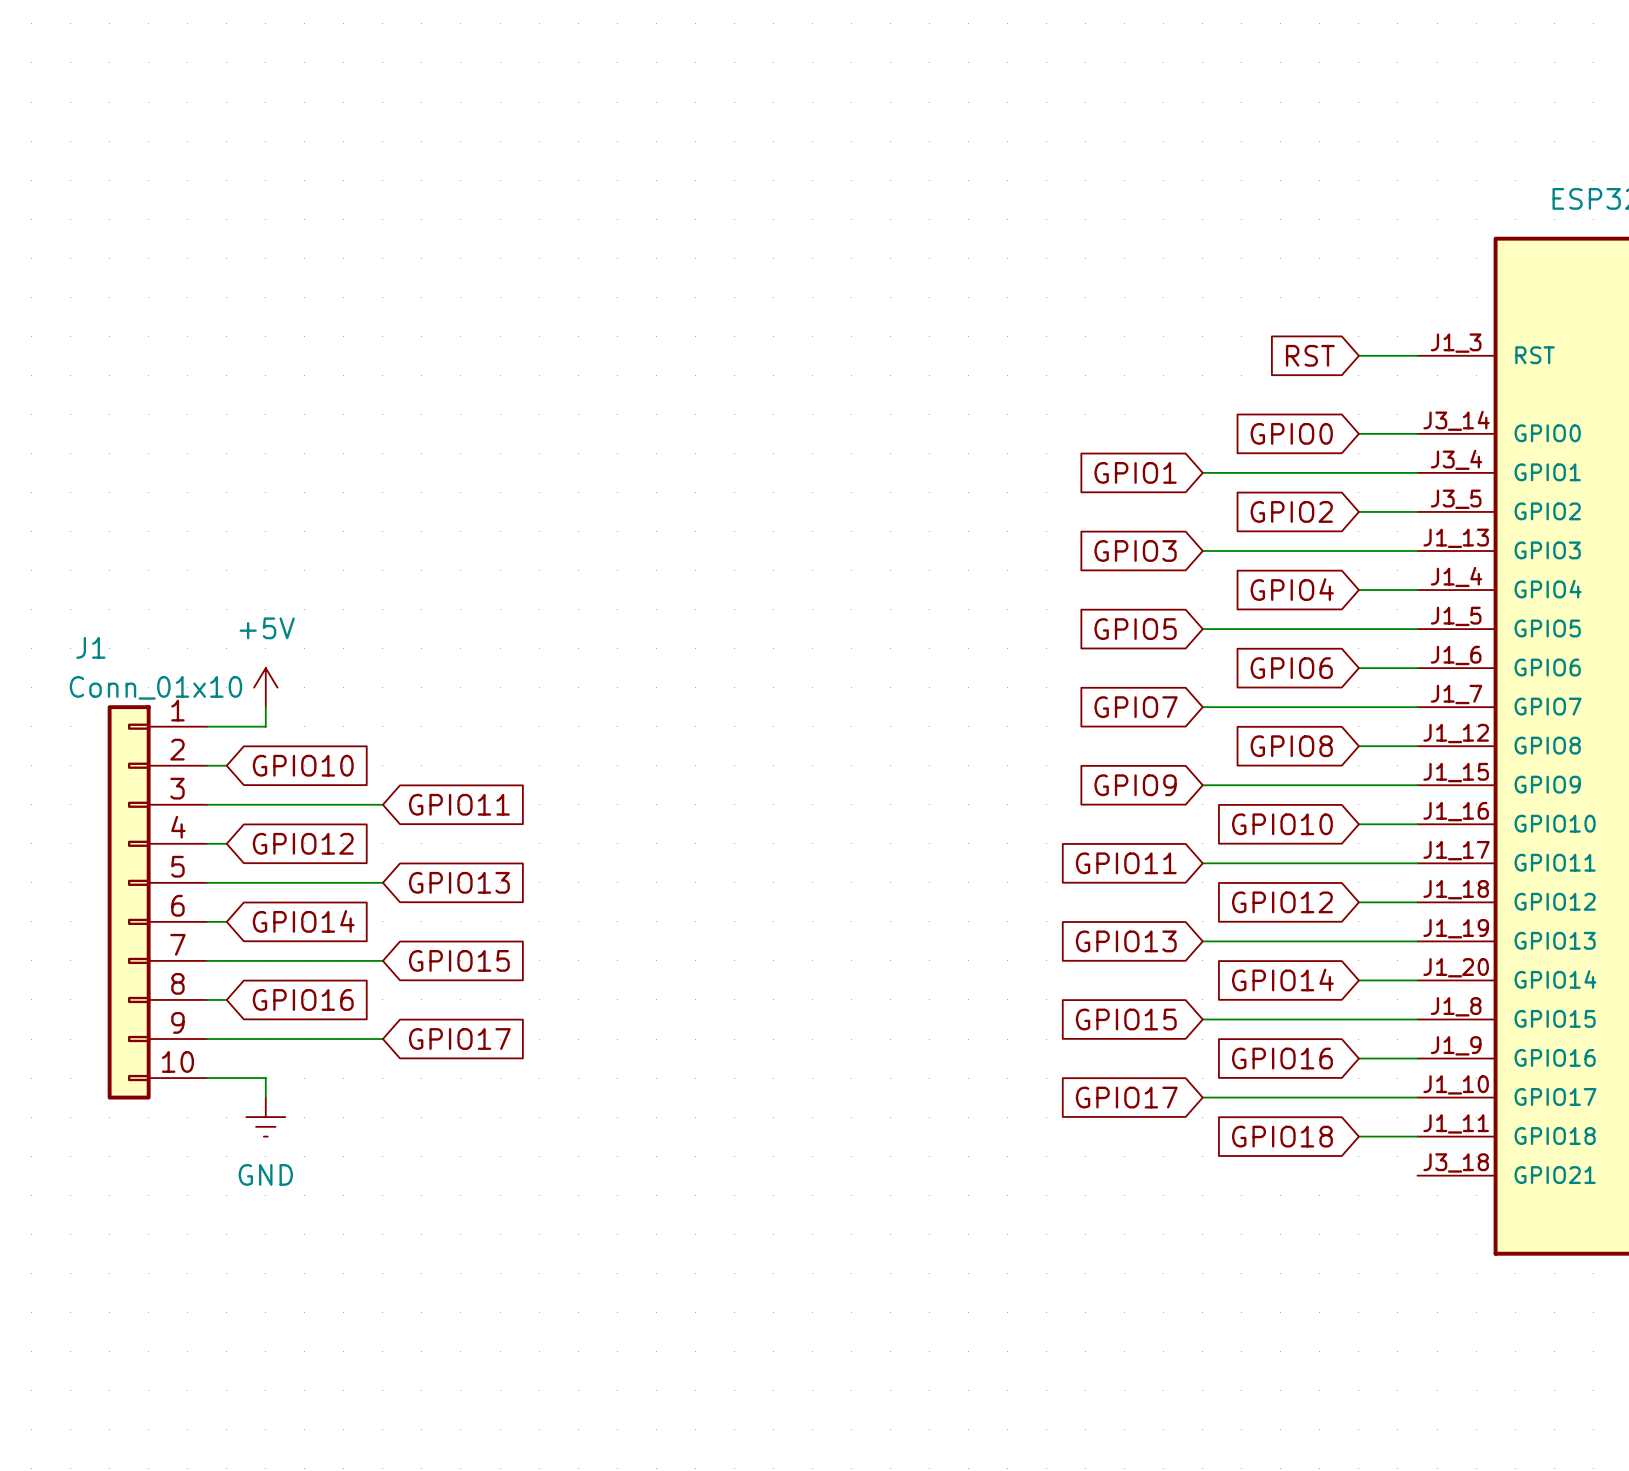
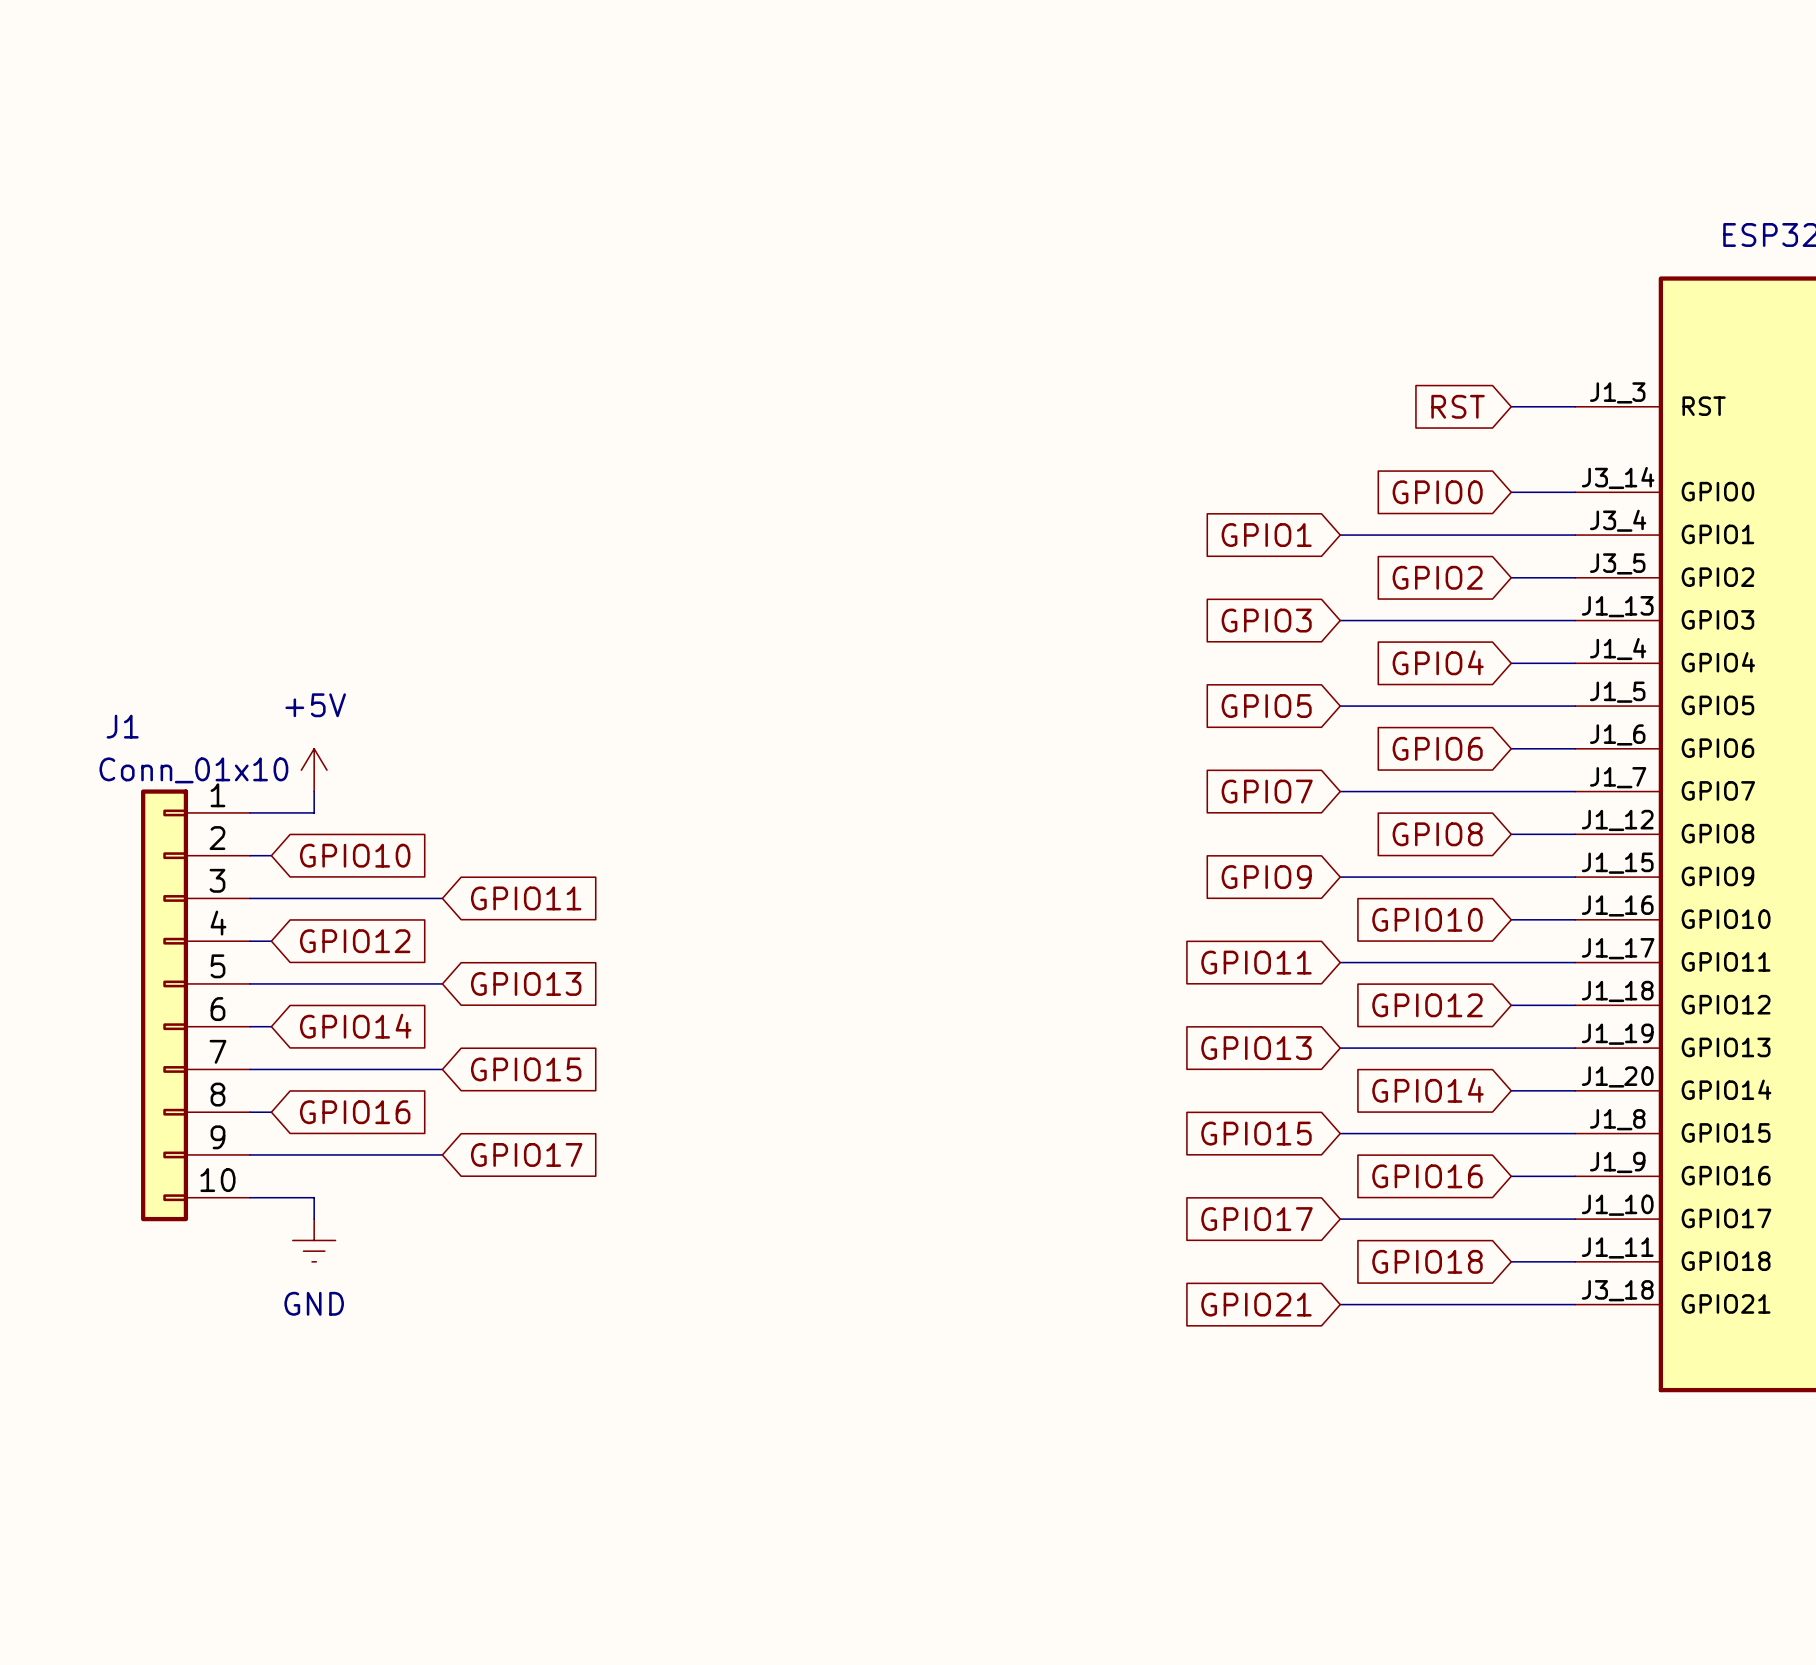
global label: none -> GPIO21 (1256, 1304)
wire: none -> (1340, 1304) (1575, 1304)

